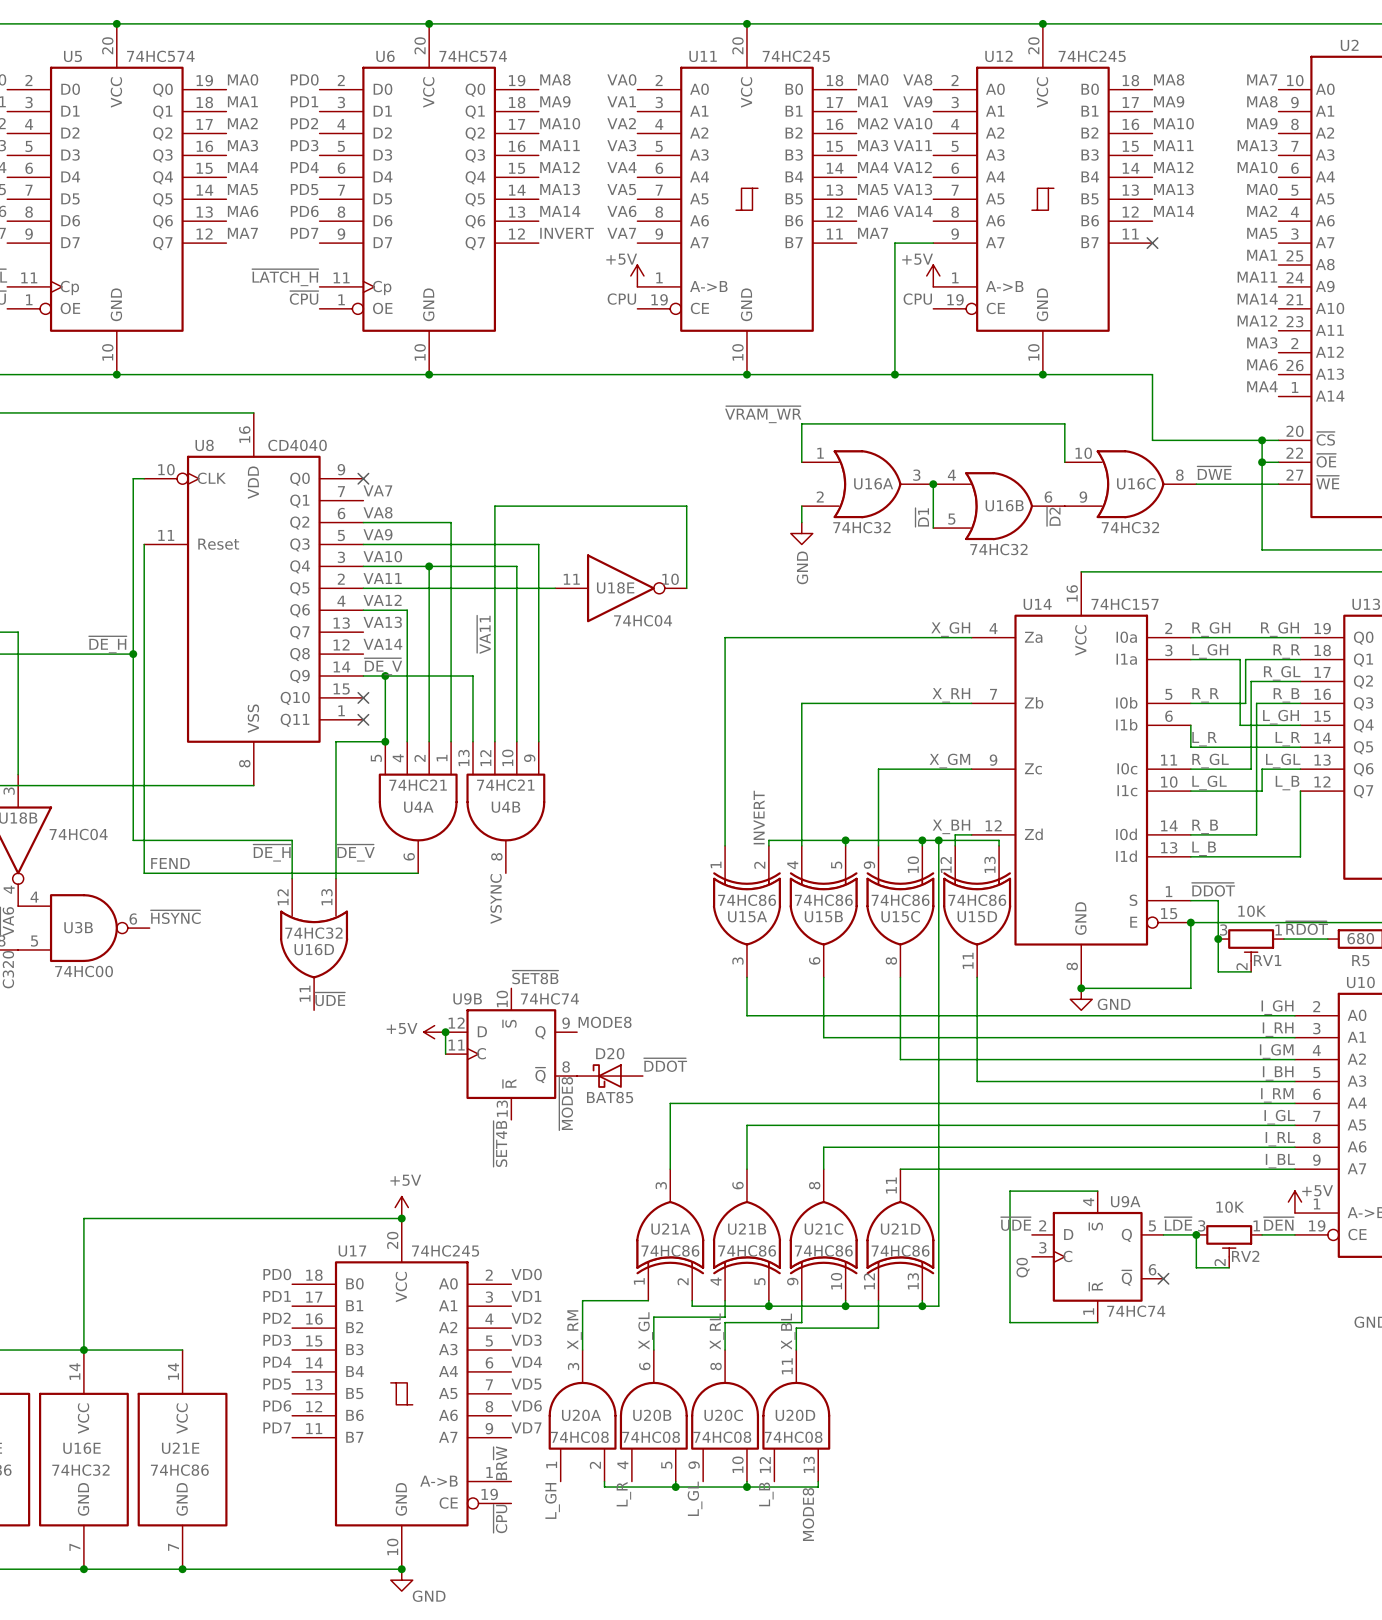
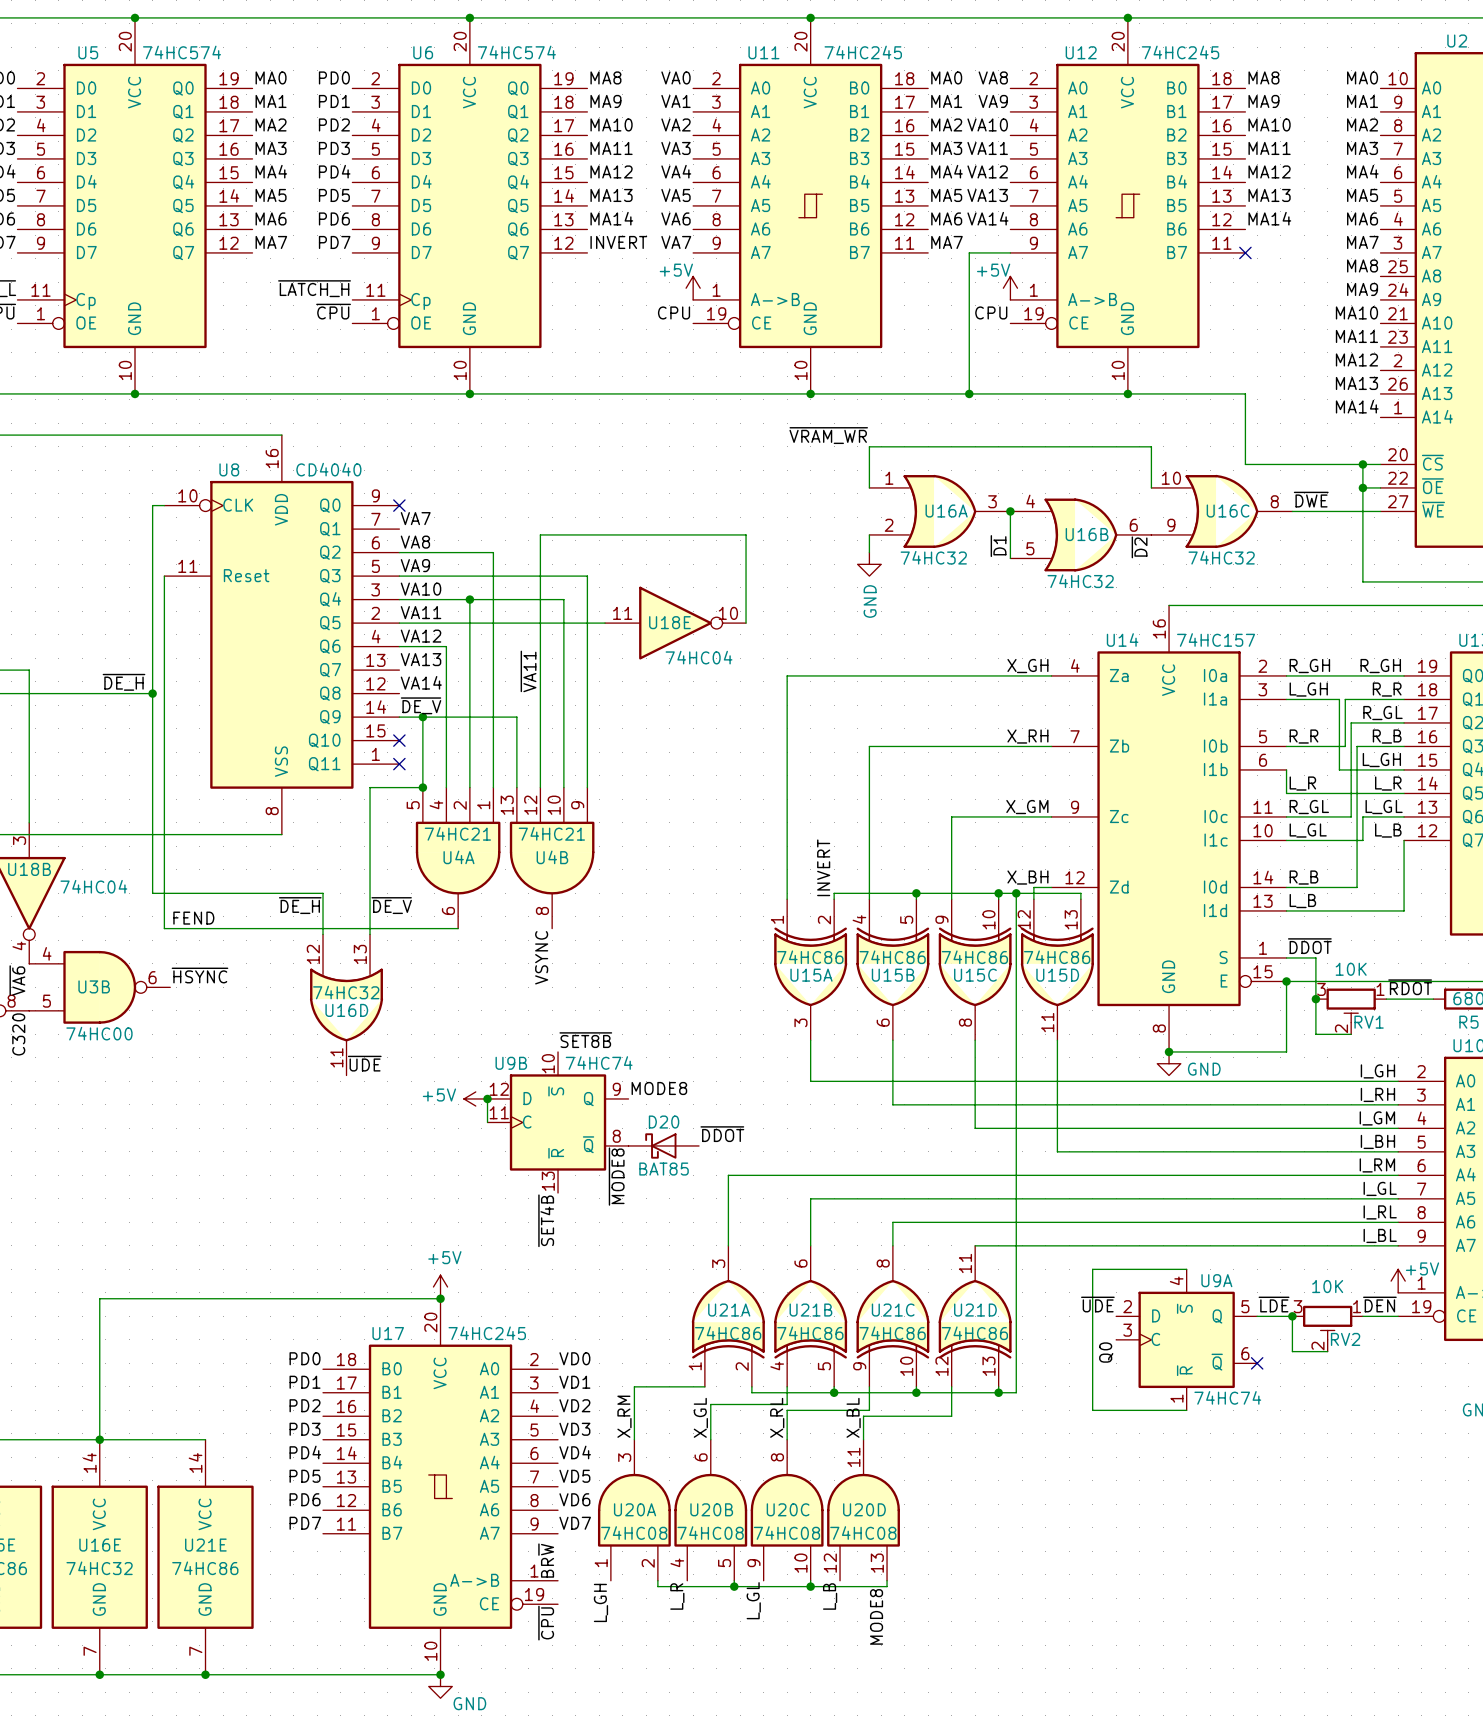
label: MA7 (1262, 79) -> MA0 (1362, 77)
label: MA8 (1262, 101) -> MA1 (1362, 101)
label: MA9 (1262, 123) -> MA2 (1362, 124)
label: MA13 (1257, 145) -> MA3 (1362, 148)
label: MA10 (1257, 167) -> MA4 (1362, 171)
label: MA0 (1262, 189) -> MA5 (1362, 195)
label: MA2 (1262, 211) -> MA6 (1362, 218)
label: MA5 (1262, 233) -> MA7 (1362, 242)
label: MA1 (1262, 255) -> MA8 (1362, 265)
label: MA11 (1257, 277) -> MA9 (1362, 289)
label: MA14 (1257, 299) -> MA10 (1356, 312)
label: MA12 (1257, 320) -> MA11 (1356, 336)
label: MA3 (1262, 342) -> MA12 (1356, 359)
label: MA6 (1262, 364) -> MA13 (1356, 383)
label: MA4 (1262, 386) -> MA14 (1357, 406)

